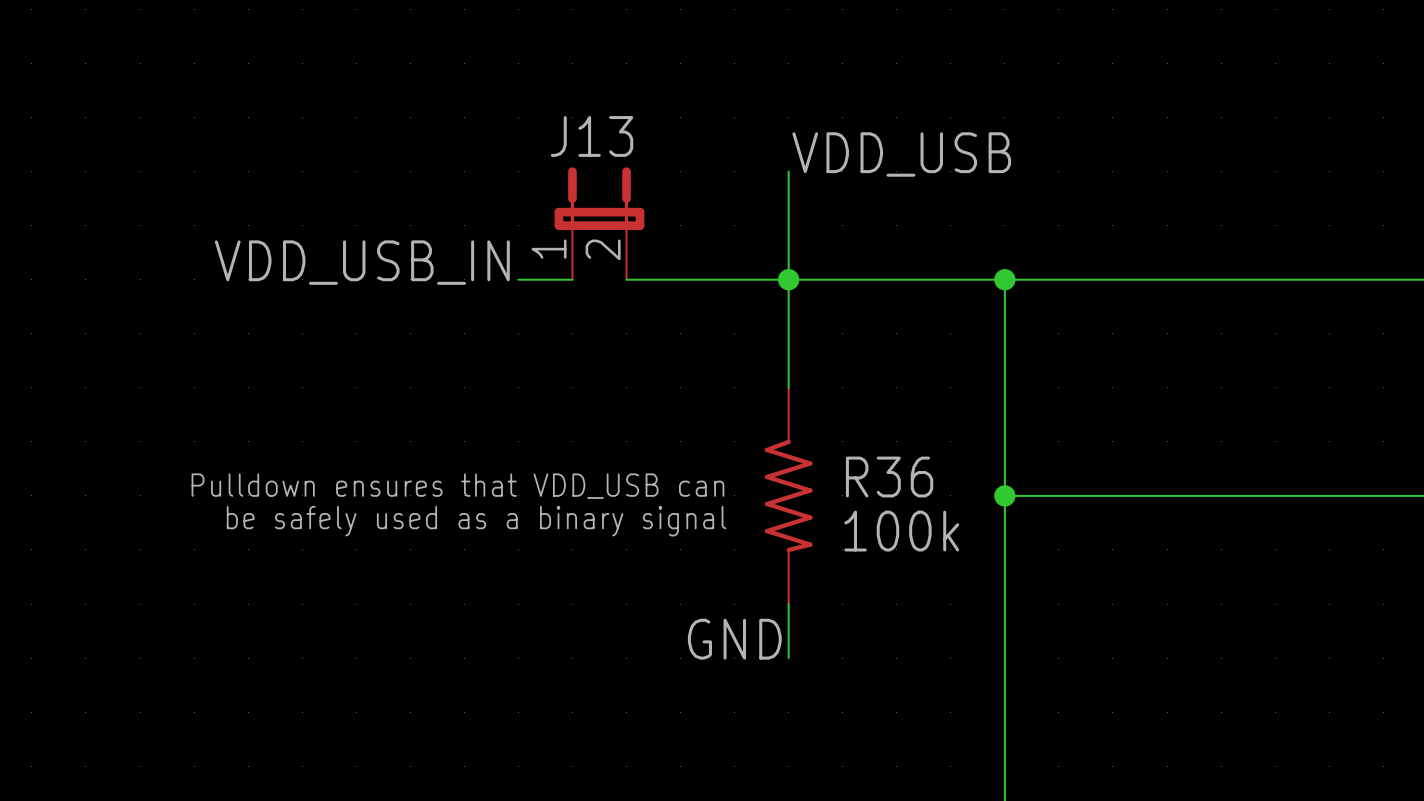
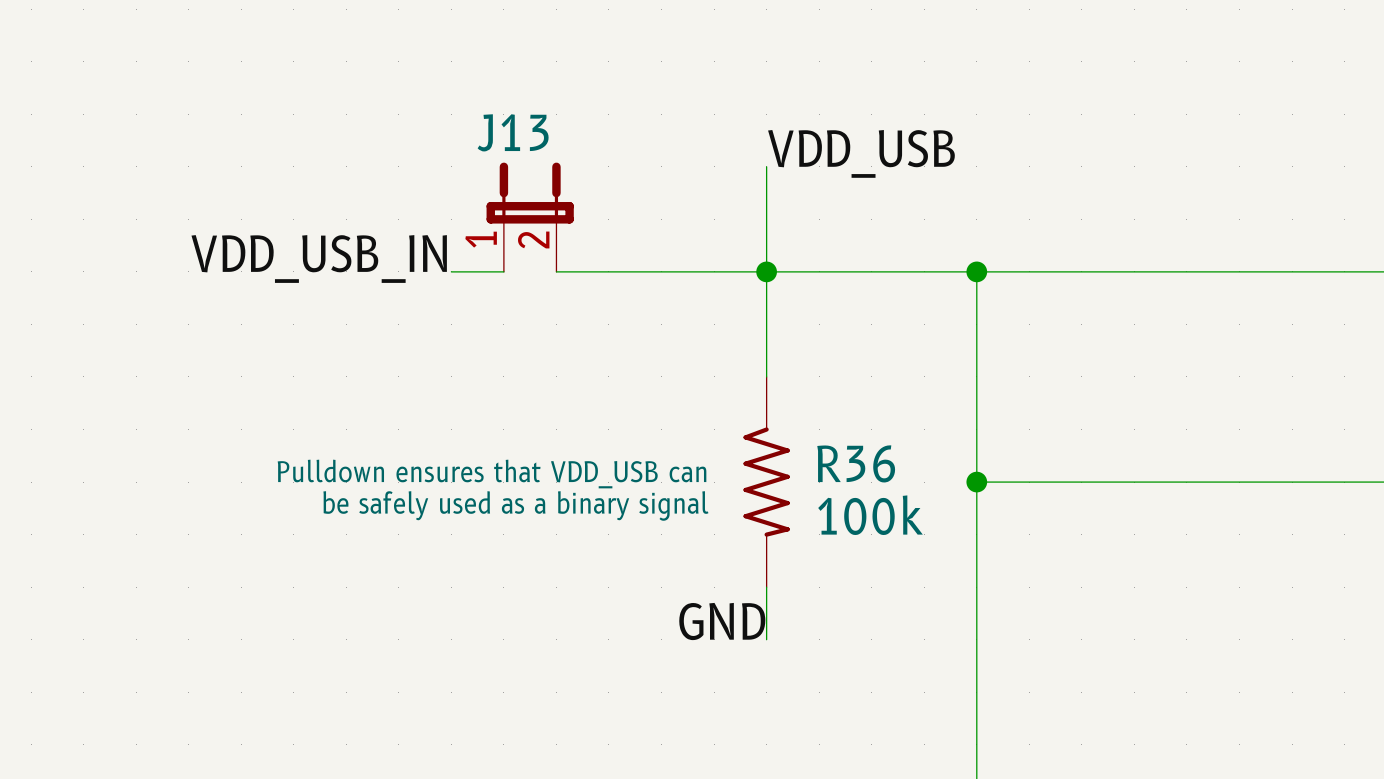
J13 position: (599, 223) -> (530, 217)
label position: VDD_USB_IN (362, 262) -> VDD_USB_IN (319, 259)
wire: (518, 279) (572, 279) -> (503, 271) (451, 271)
wire: none -> (556, 271) (608, 271)

